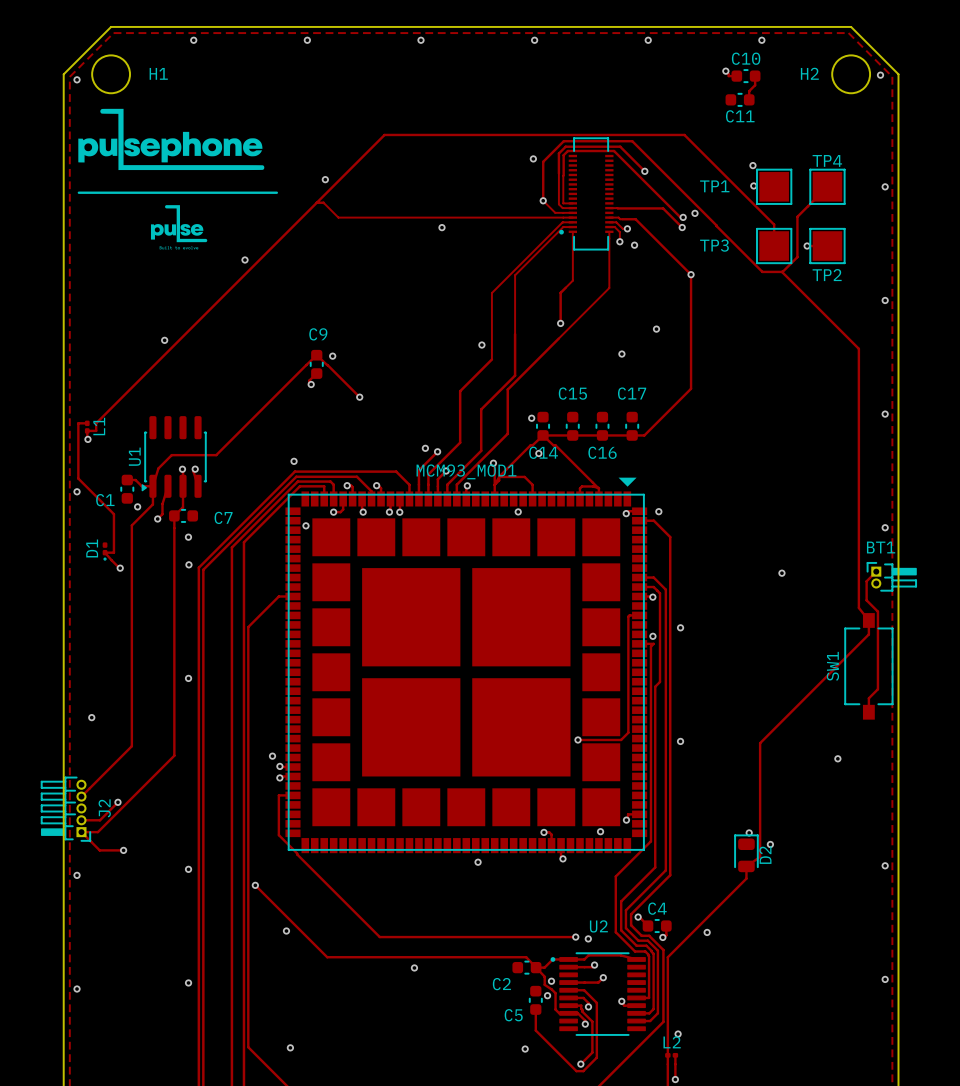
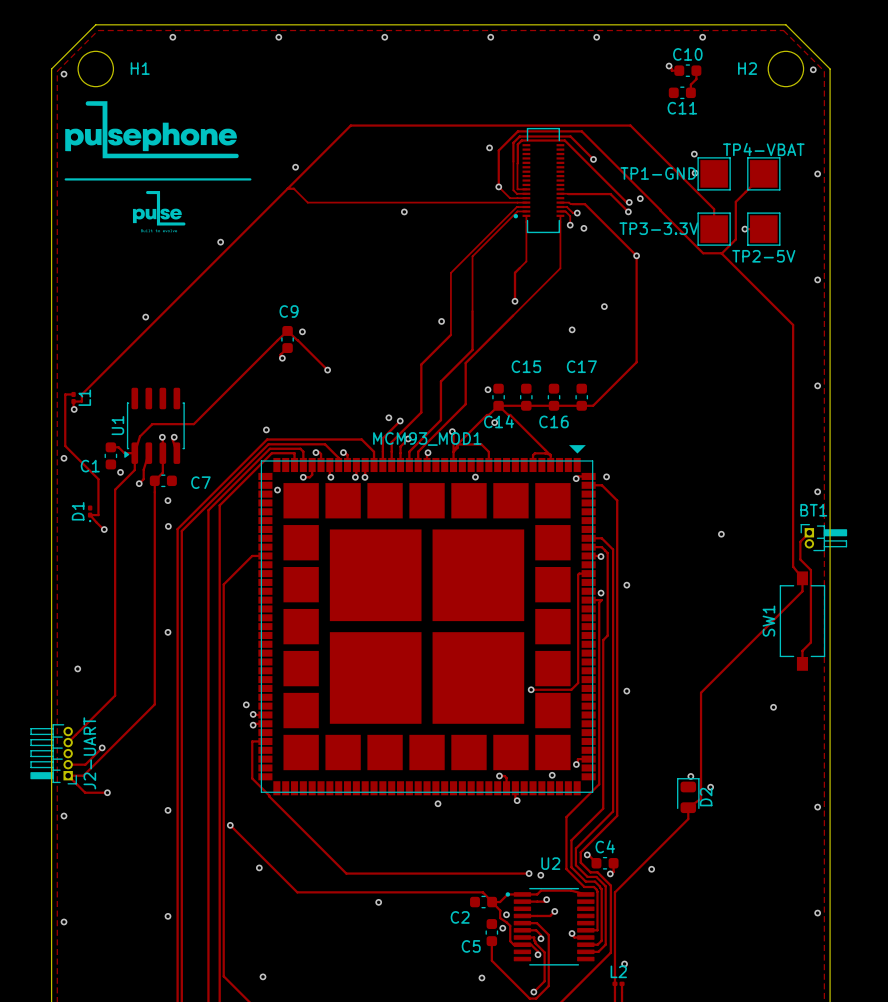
TP4 name: TP4 (827, 160) -> TP4-VBAT (763, 149)
TP1 name: TP1 (714, 186) -> TP1-GND (658, 173)
TP3 name: TP3 (714, 245) -> TP3-3.3V (658, 228)
TP2 name: TP2 (827, 275) -> TP2-5V (763, 256)
J2 name: J2 (104, 808) -> J2-UART (89, 753)

